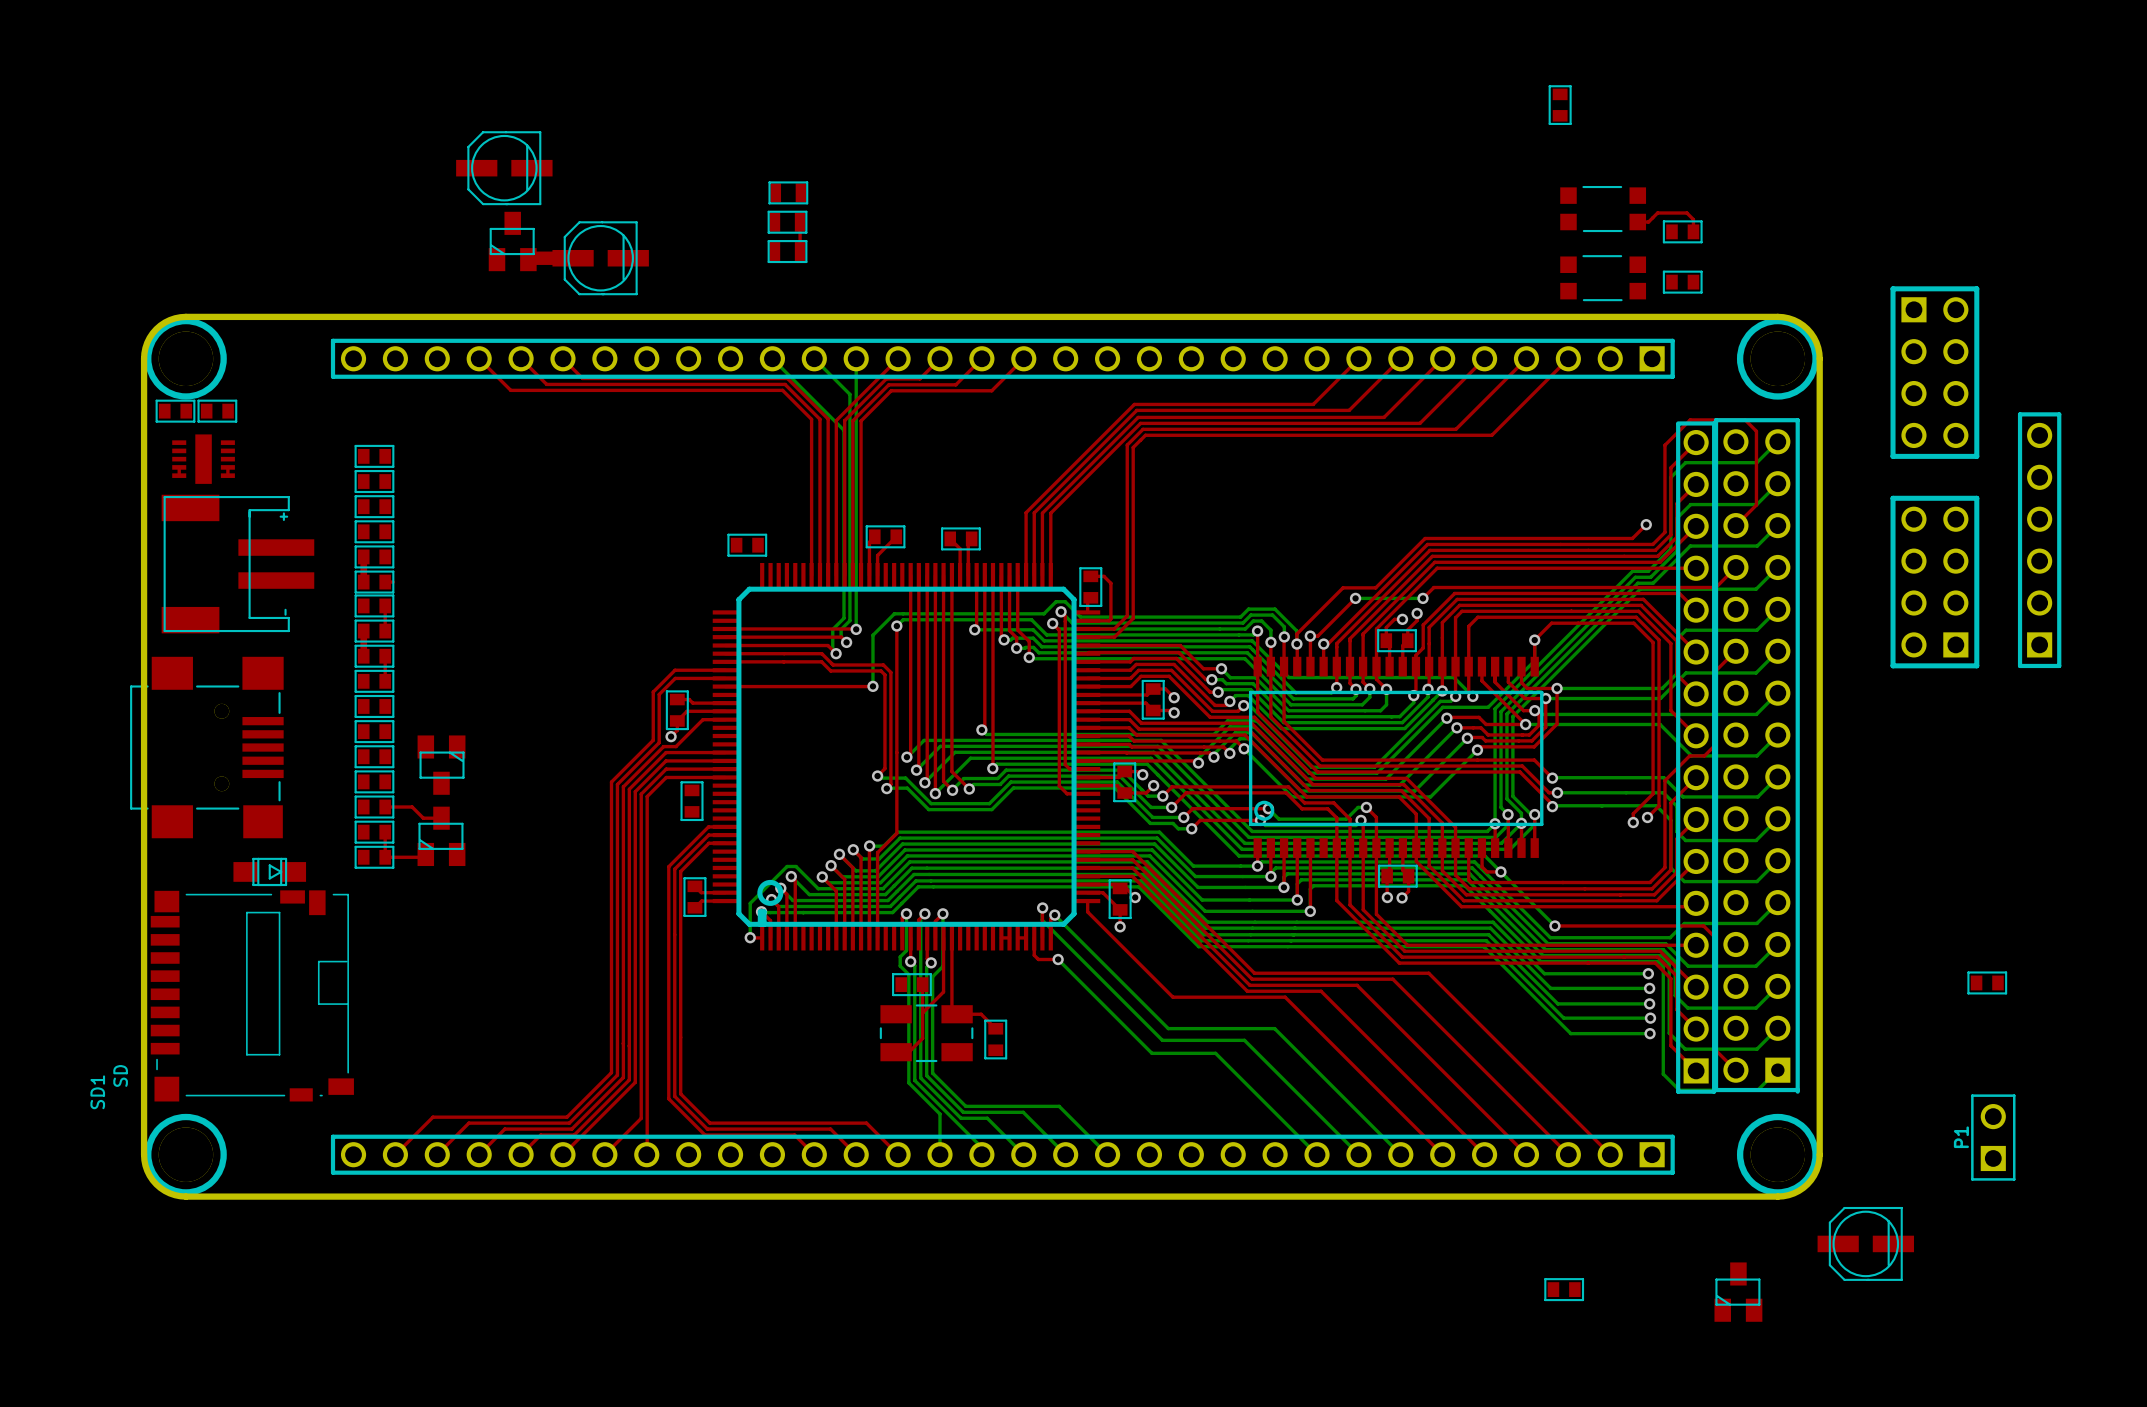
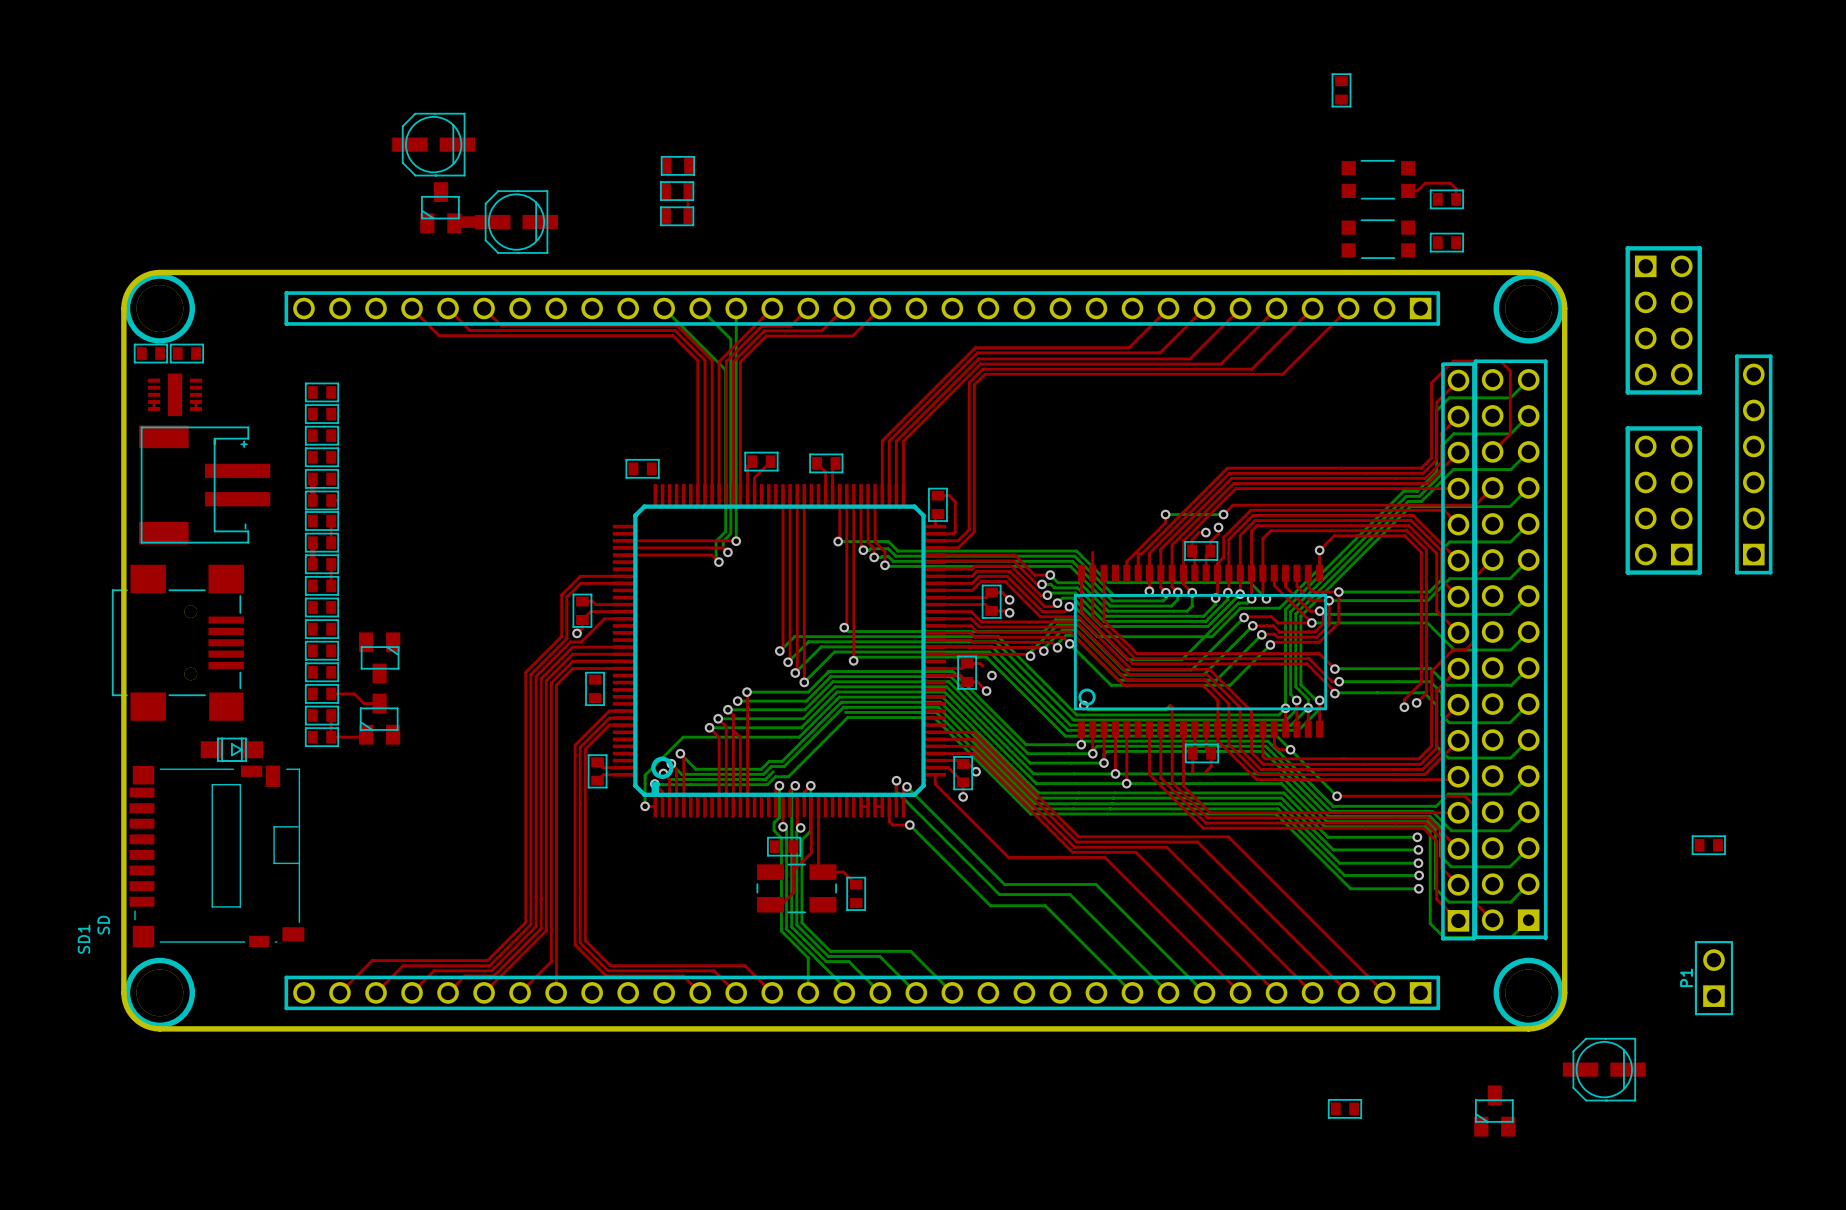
top track: (1646, 524) (1632, 538) (1425, 538) (1375, 587) (1343, 587) (1296, 634) (1297, 666) -> none
via: (1646, 524) -> none
top track: (943, 575) (943, 781) (952, 790) -> none
top track: (951, 575) (951, 771) (969, 789) -> none
top track: (1355, 598) (1317, 636) (1310, 636) -> (1165, 514) (1165, 522) (1126, 561)
top track: (1061, 611) (1065, 615) (1065, 764) (1069, 769) (1087, 769) -> none
bottom track: (1061, 611) (1072, 623) (1242, 623) (1250, 615) (1272, 615) (1284, 626) (1284, 636) -> none
via: (1061, 611) -> none
top track: (1052, 623) (1059, 630) (1059, 785) (1067, 793) (1087, 793) -> none
bottom track: (1052, 623) (1058, 628) (1245, 628) (1253, 621) (1261, 621) (1270, 630) (1270, 642) -> none
via: (1052, 623) -> none
top track: (896, 626) (896, 833) (877, 852) (877, 937) -> none
bottom track: (896, 626) (903, 619) (1031, 619) (1046, 634) (1253, 634) (1257, 631) -> none
via: (896, 626) -> none
top track: (1257, 631) (1257, 666) -> none
via: (1257, 631) -> none
top track: (1284, 636) (1284, 666) -> none
via: (1284, 636) -> none
top track: (1310, 636) (1310, 653) -> none
via: (1310, 636) -> none
via: (1270, 642) -> none
bottom track: (1296, 644) (1296, 631) (1274, 609) (1248, 609) (1240, 617) (1080, 617) (1065, 601) (1056, 601) (1043, 613) (894, 613) (872, 635) (872, 686) -> none
via: (1296, 644) -> none
via: (1323, 644) -> none
top track: (725, 653) (821, 653) (833, 665) (883, 665) (890, 672) (890, 784) (886, 788) -> none
top track: (725, 661) (821, 661) (830, 670) (881, 670) (884, 674) (884, 768) (877, 776) -> none
top track: (725, 686) (872, 686) -> none
via: (872, 686) -> none
bottom track: (1276, 740) (1308, 773) (1377, 773) (1409, 740) -> (1097, 636) (1212, 636)
via: (1142, 774) -> none
bottom track: (877, 776) (879, 778) (905, 778) (931, 803) (989, 803) (1011, 782) (1117, 782) (1152, 817) (1183, 817) -> none
via: (877, 776) -> none
top track: (1153, 785) (1146, 793) (1136, 793) -> (986, 691) (977, 681)
bottom track: (886, 788) (907, 788) (928, 809) (991, 809) (1013, 788) (1114, 788) (1150, 823) (1173, 823) (1178, 828) (1191, 828) -> none
via: (886, 788) -> none
bottom track: (969, 789) (973, 784) (1000, 784) (1008, 776) (1119, 776) (1151, 807) (1171, 807) -> none
via: (969, 789) -> none
bottom track: (952, 790) (963, 778) (997, 778) (1006, 770) (1122, 770) (1148, 796) (1162, 796) -> none
via: (952, 790) -> none
top track: (1162, 796) (1172, 786) (1288, 786) (1304, 802) (1333, 802) (1350, 819) (1350, 848) -> none
via: (1162, 796) -> none
via: none -> (986, 691)
top track: none -> (747, 692) (747, 727)
via: none -> (747, 692)
top track: (1171, 807) (1186, 792) (1286, 792) (1302, 808) (1327, 808) (1336, 817) (1336, 848) -> none
via: (1171, 807) -> none
top track: (1366, 807) (1376, 817) (1376, 848) -> none
bottom track: (1366, 807) (1358, 807) (1346, 819) (1278, 819) (1268, 808) -> none
via: (1366, 807) -> none
top track: (1268, 808) (1192, 808) (1183, 817) -> none
via: (1268, 808) -> none
via: none -> (737, 701)
via: (1183, 817) -> none
top track: (1260, 820) (1200, 820) (1191, 828) -> none
via: (1361, 820) -> none
via: none -> (727, 709)
via: (1191, 828) -> none
bottom track: (1159, 832) (897, 832) (883, 846) (869, 846) -> (997, 715) (952, 671) (828, 671) (808, 692) (747, 692)
via: none -> (718, 718)
bottom track: (1157, 838) (900, 838) (879, 858) (862, 858) (853, 849) -> (994, 720) (950, 676) (830, 676) (806, 701) (737, 701)
bottom track: (1154, 844) (902, 844) (875, 870) (855, 870) (839, 854) -> (992, 725) (948, 681) (833, 681) (805, 709) (727, 709)
via: (869, 845) -> none
via: none -> (709, 727)
via: (853, 849) -> none
bottom track: (1152, 849) (904, 849) (878, 876) (842, 876) (831, 865) -> (990, 730) (946, 686) (835, 686) (803, 718) (718, 718)
top track: (839, 854) (852, 867) -> (727, 709) (733, 715) (733, 746)
via: (839, 854) -> none
bottom track: (1149, 855) (907, 855) (880, 882) (828, 882) (822, 876) -> (988, 735) (944, 691) (837, 691) (801, 727) (709, 727)
bottom track: (1147, 861) (909, 861) (883, 888) (818, 888) (796, 866) (787, 866) (750, 903) -> (986, 741) (942, 697) (839, 697) (799, 737) (683, 737) (645, 776)
top track: (831, 865) (844, 879) -> (718, 718) (726, 726) (726, 756)
via: (831, 865) -> none
bottom track: (1145, 868) (911, 868) (894, 885) -> (984, 746) (940, 702) (841, 702) (782, 761) (769, 761)
bottom track: (1143, 874) (914, 874) (897, 891) -> (982, 751) (938, 707) (843, 707) (784, 766) (771, 766)
top track: (822, 876) (836, 891) -> (709, 727) (719, 737) (719, 766)
via: (822, 876) -> none
bottom track: (1141, 880) (915, 880) (899, 897) -> (981, 757) (936, 712) (845, 712)
bottom track: (1138, 886) (918, 886) (901, 903) -> (979, 762) (934, 717) (847, 717) (788, 776) (775, 776)
via: (1387, 897) -> none
via: (1402, 897) -> none
bottom track: (1297, 900) (1297, 883) (1301, 879) (1467, 879) (1487, 900) -> (1115, 773) (1279, 773)
bottom track: (1310, 911) (1310, 889) (1313, 885) (1464, 885) (1490, 911) -> (1126, 783) (1281, 783)

